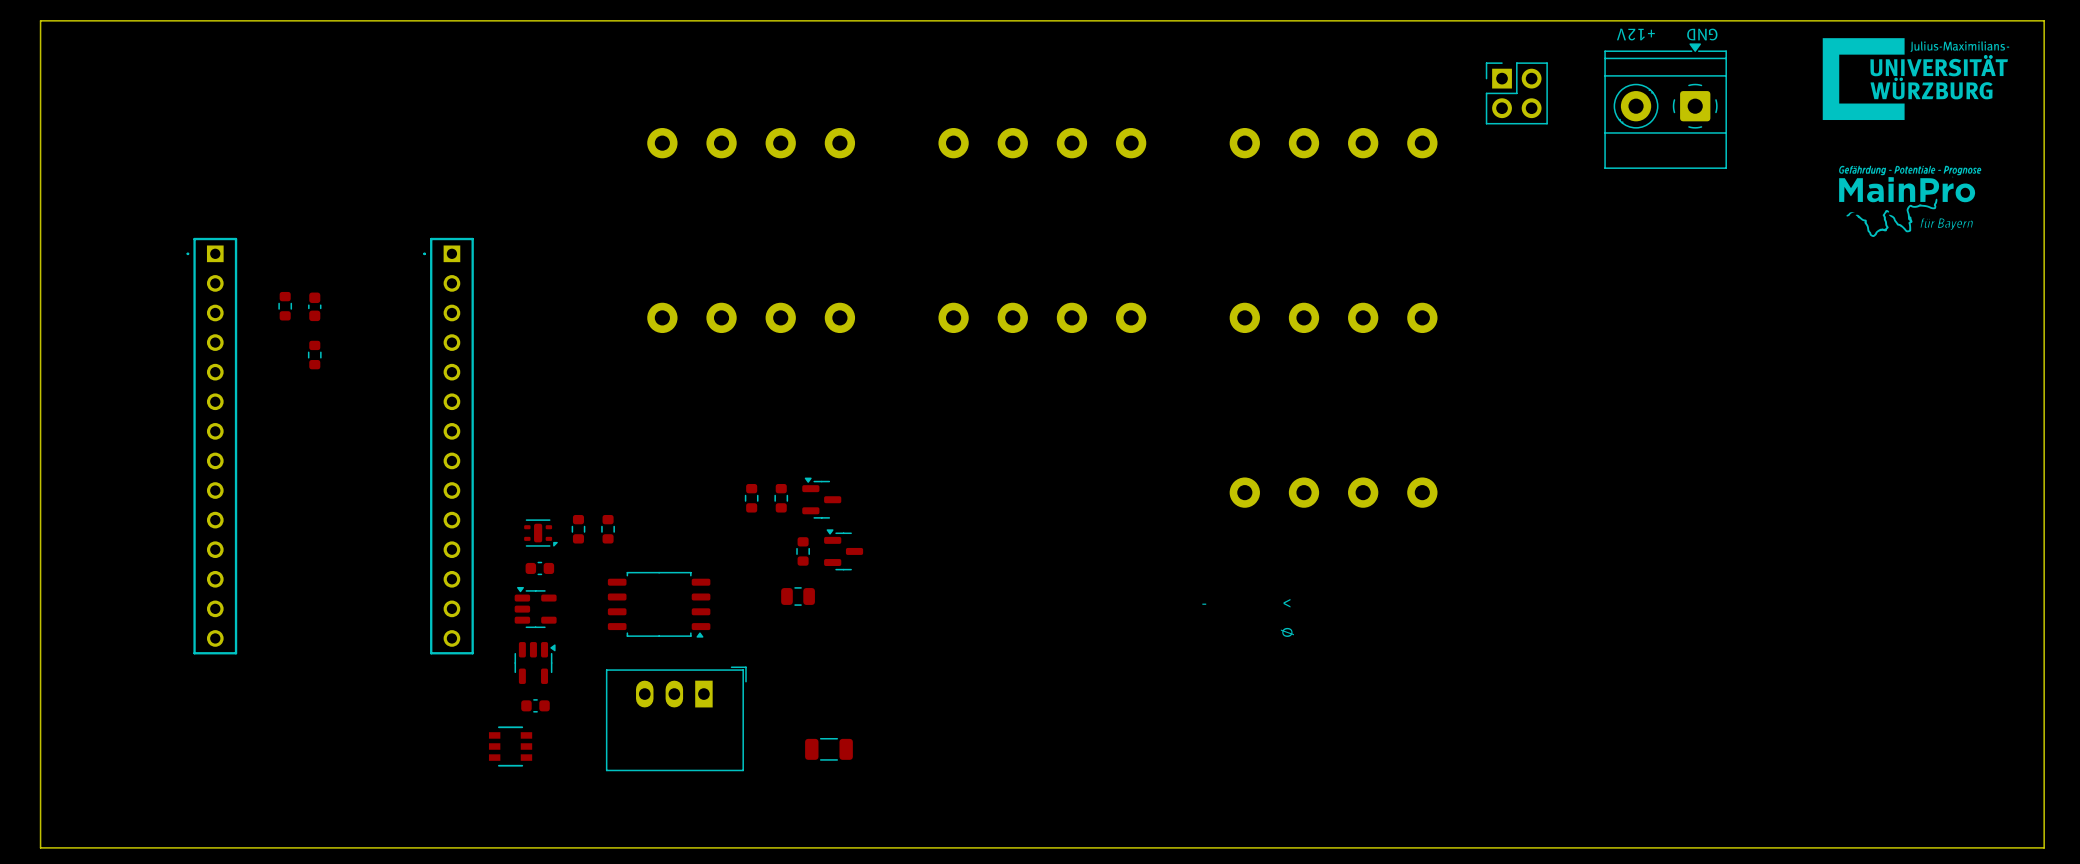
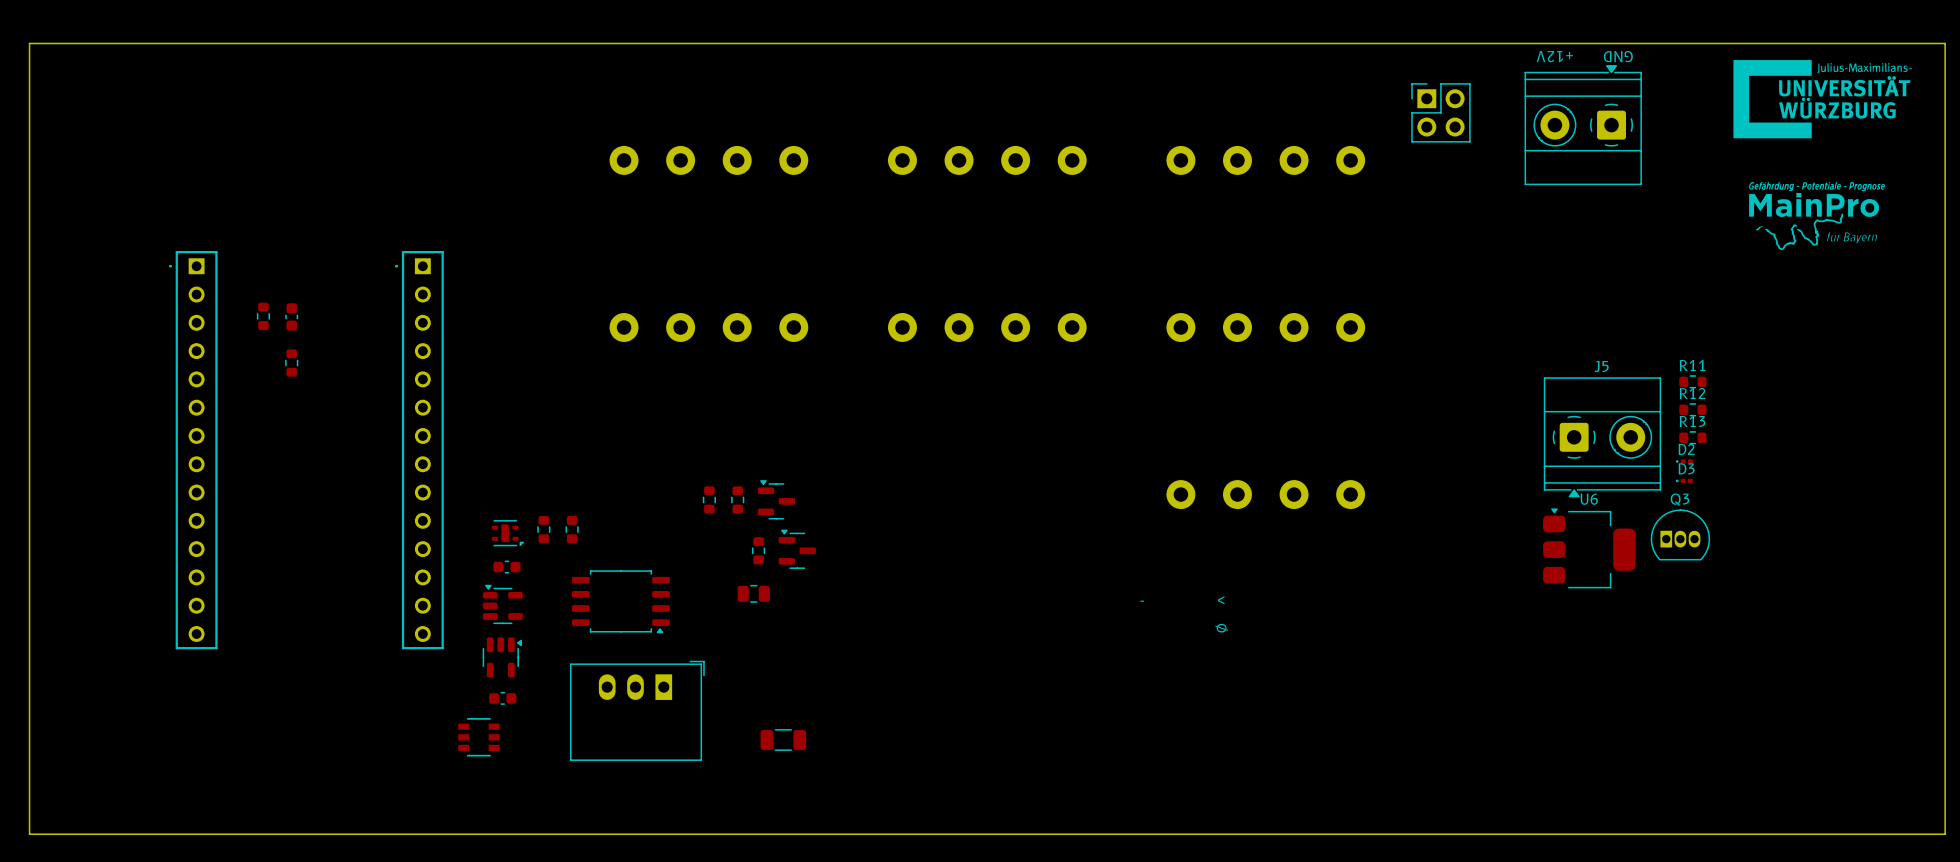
R11: none -> (1692, 381)
R12: none -> (1692, 409)
J5: none -> (1602, 437)
R13: none -> (1692, 437)
D2: none -> (1684, 461)
D3: none -> (1684, 480)
Q3: none -> (1680, 534)
U6: none -> (1589, 548)

